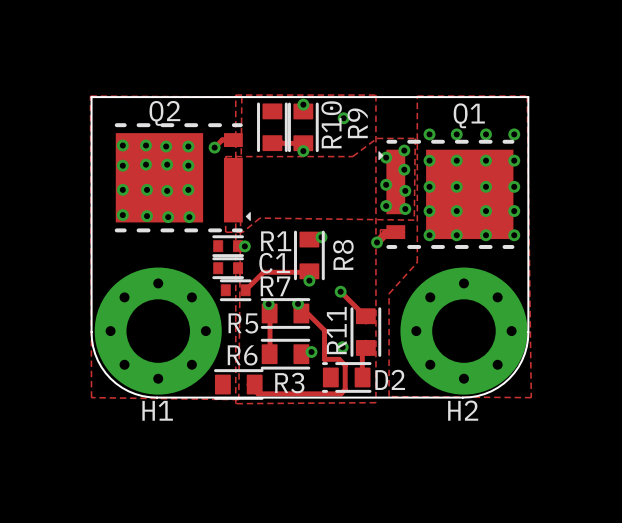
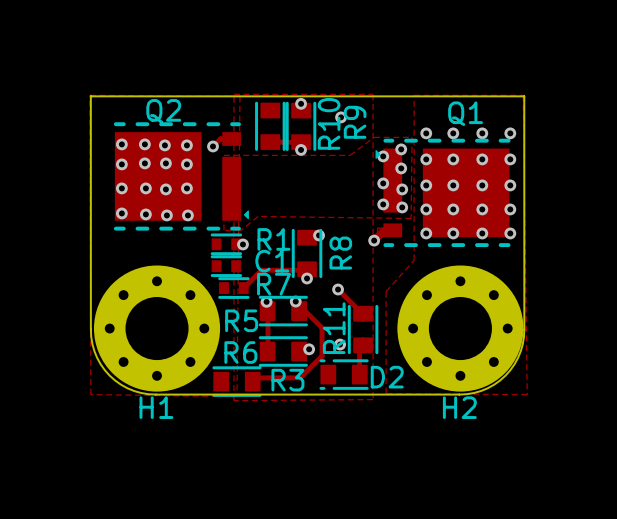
track: (324, 358) (339, 359) (345, 365) (345, 389) (340, 393) (258, 393) (248, 384) -> (322, 356) (300, 377) (255, 377)

